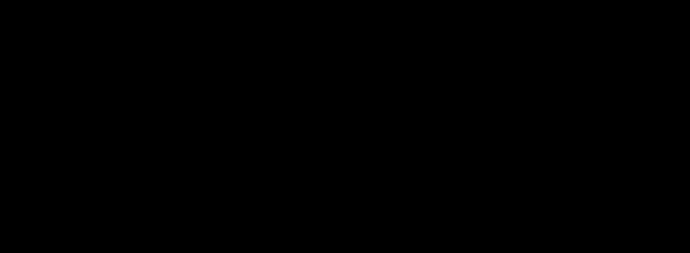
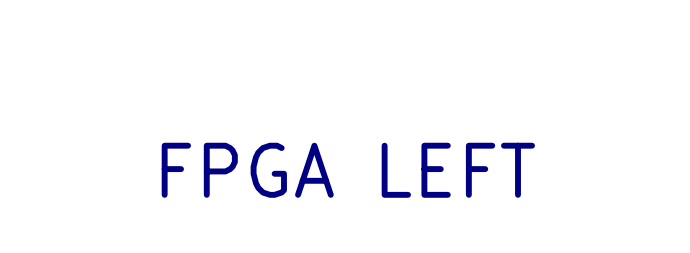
text: none -> FPGA LEFT (348, 170)

